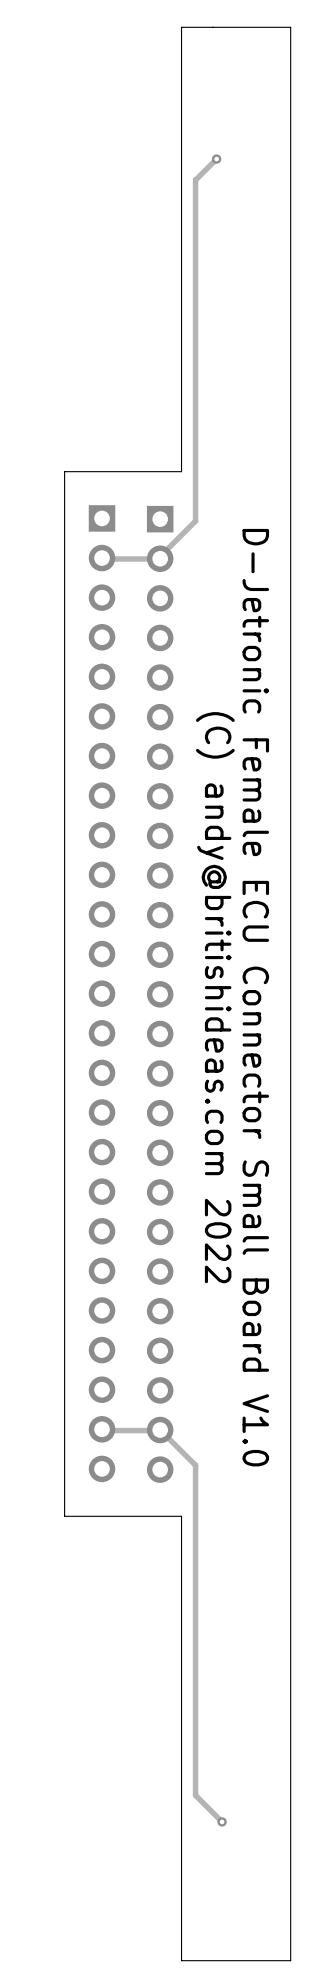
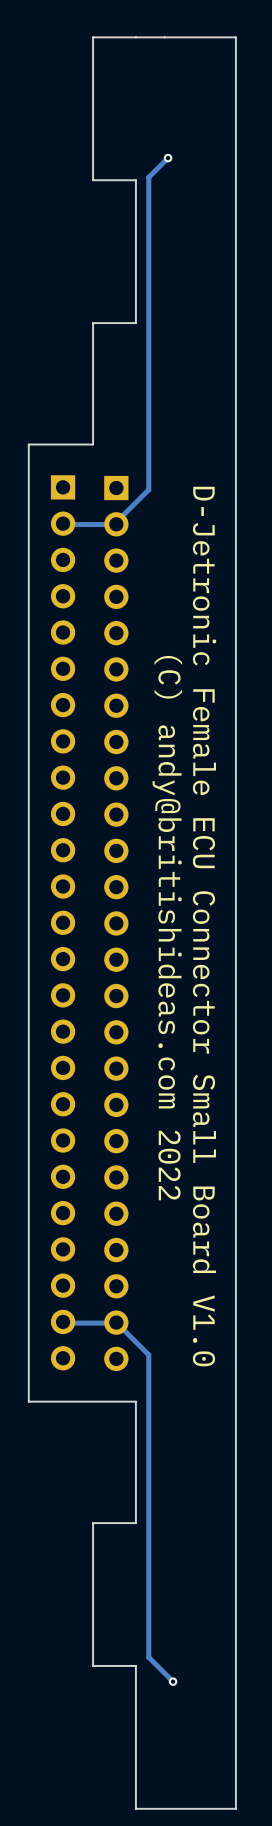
board edge: (181, 27) (181, 183) -> (135, 37) (93, 37) (93, 180) (135, 180)
board edge: (181, 339) (181, 471) (134, 471) -> (135, 323) (93, 323) (93, 444)
board edge: (181, 1648) (181, 1804) -> (135, 1523) (93, 1523) (93, 1665) (135, 1665)

